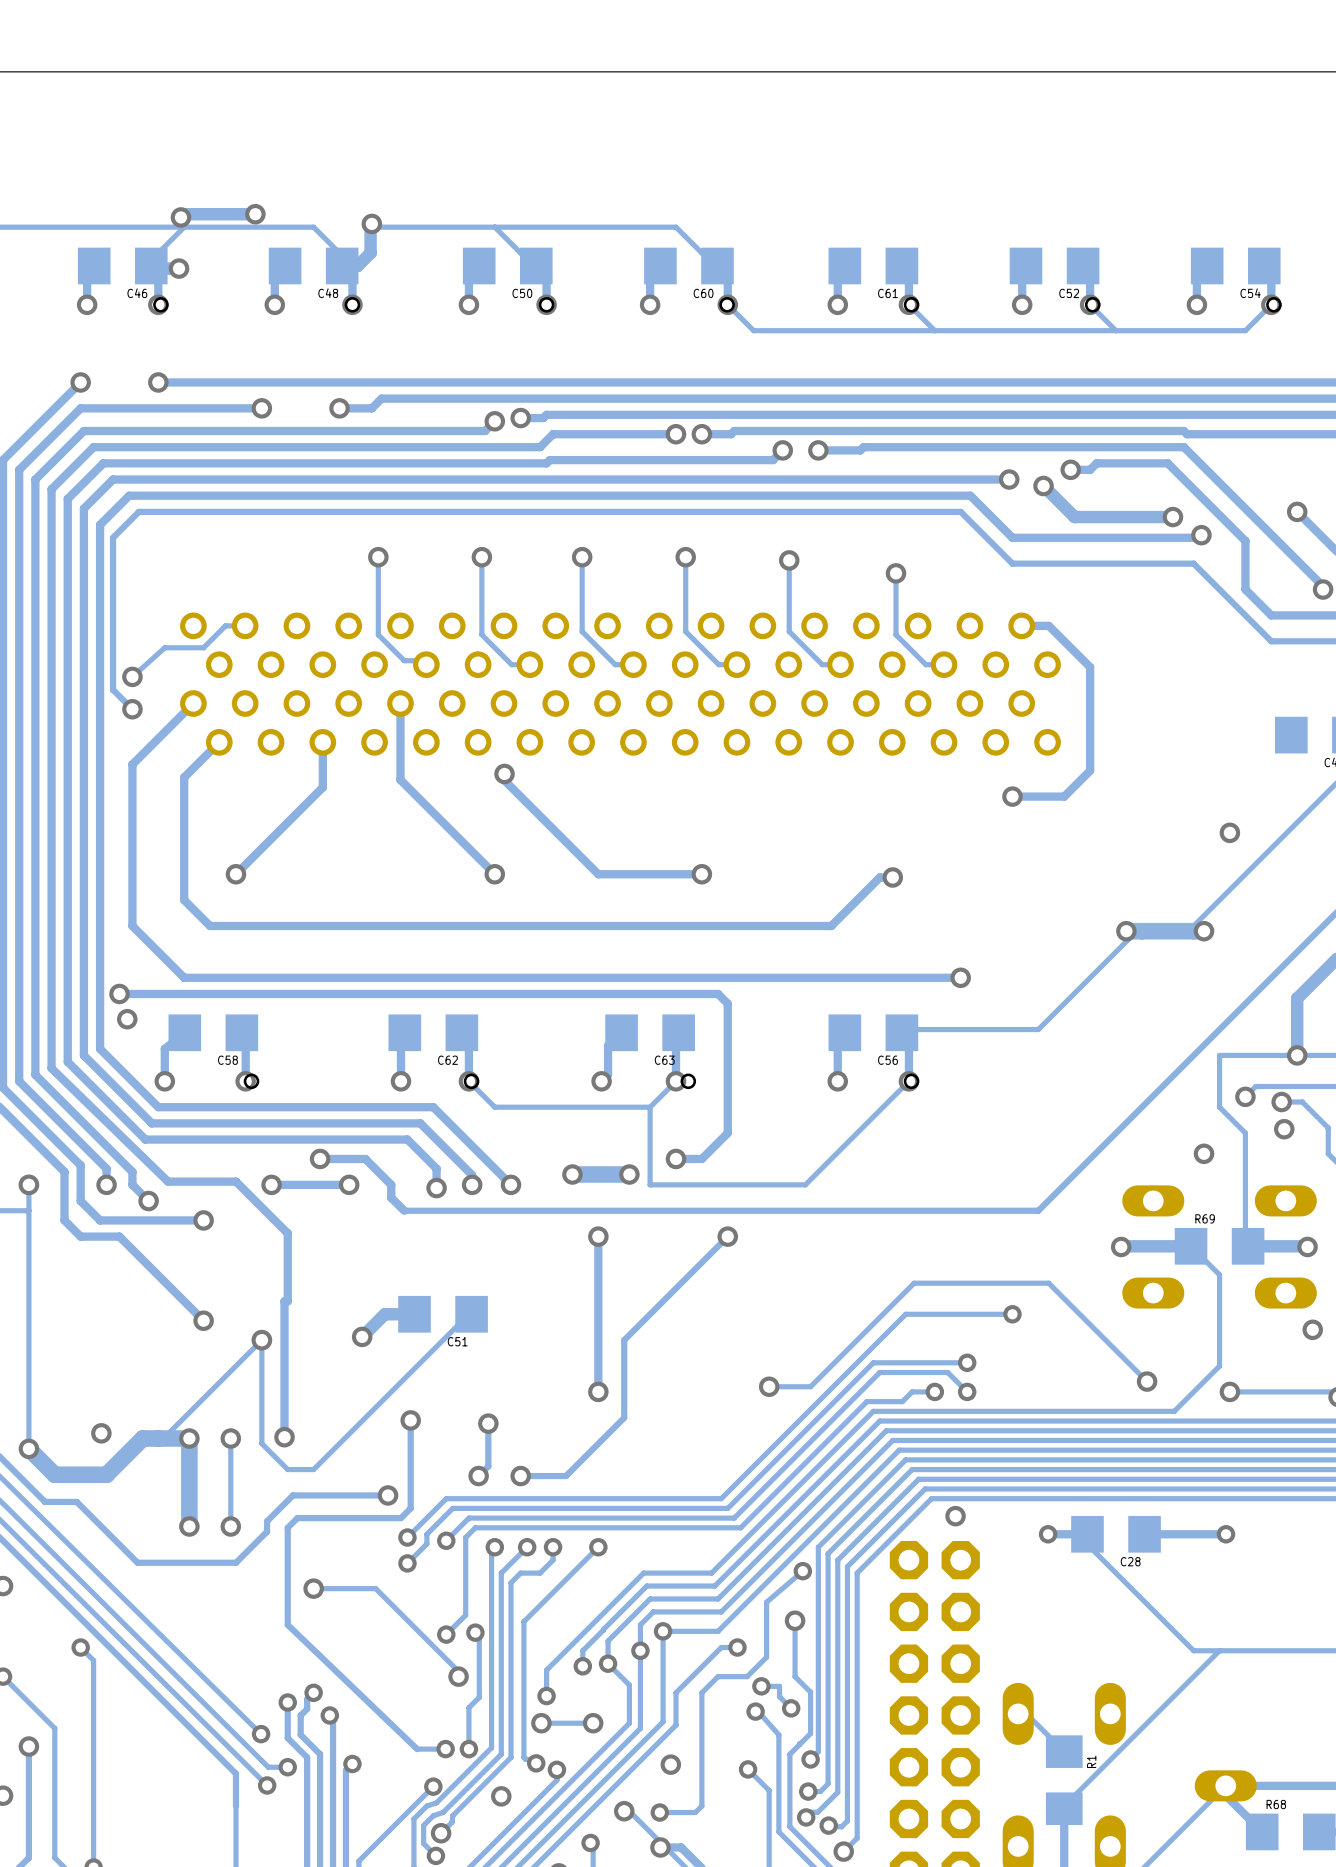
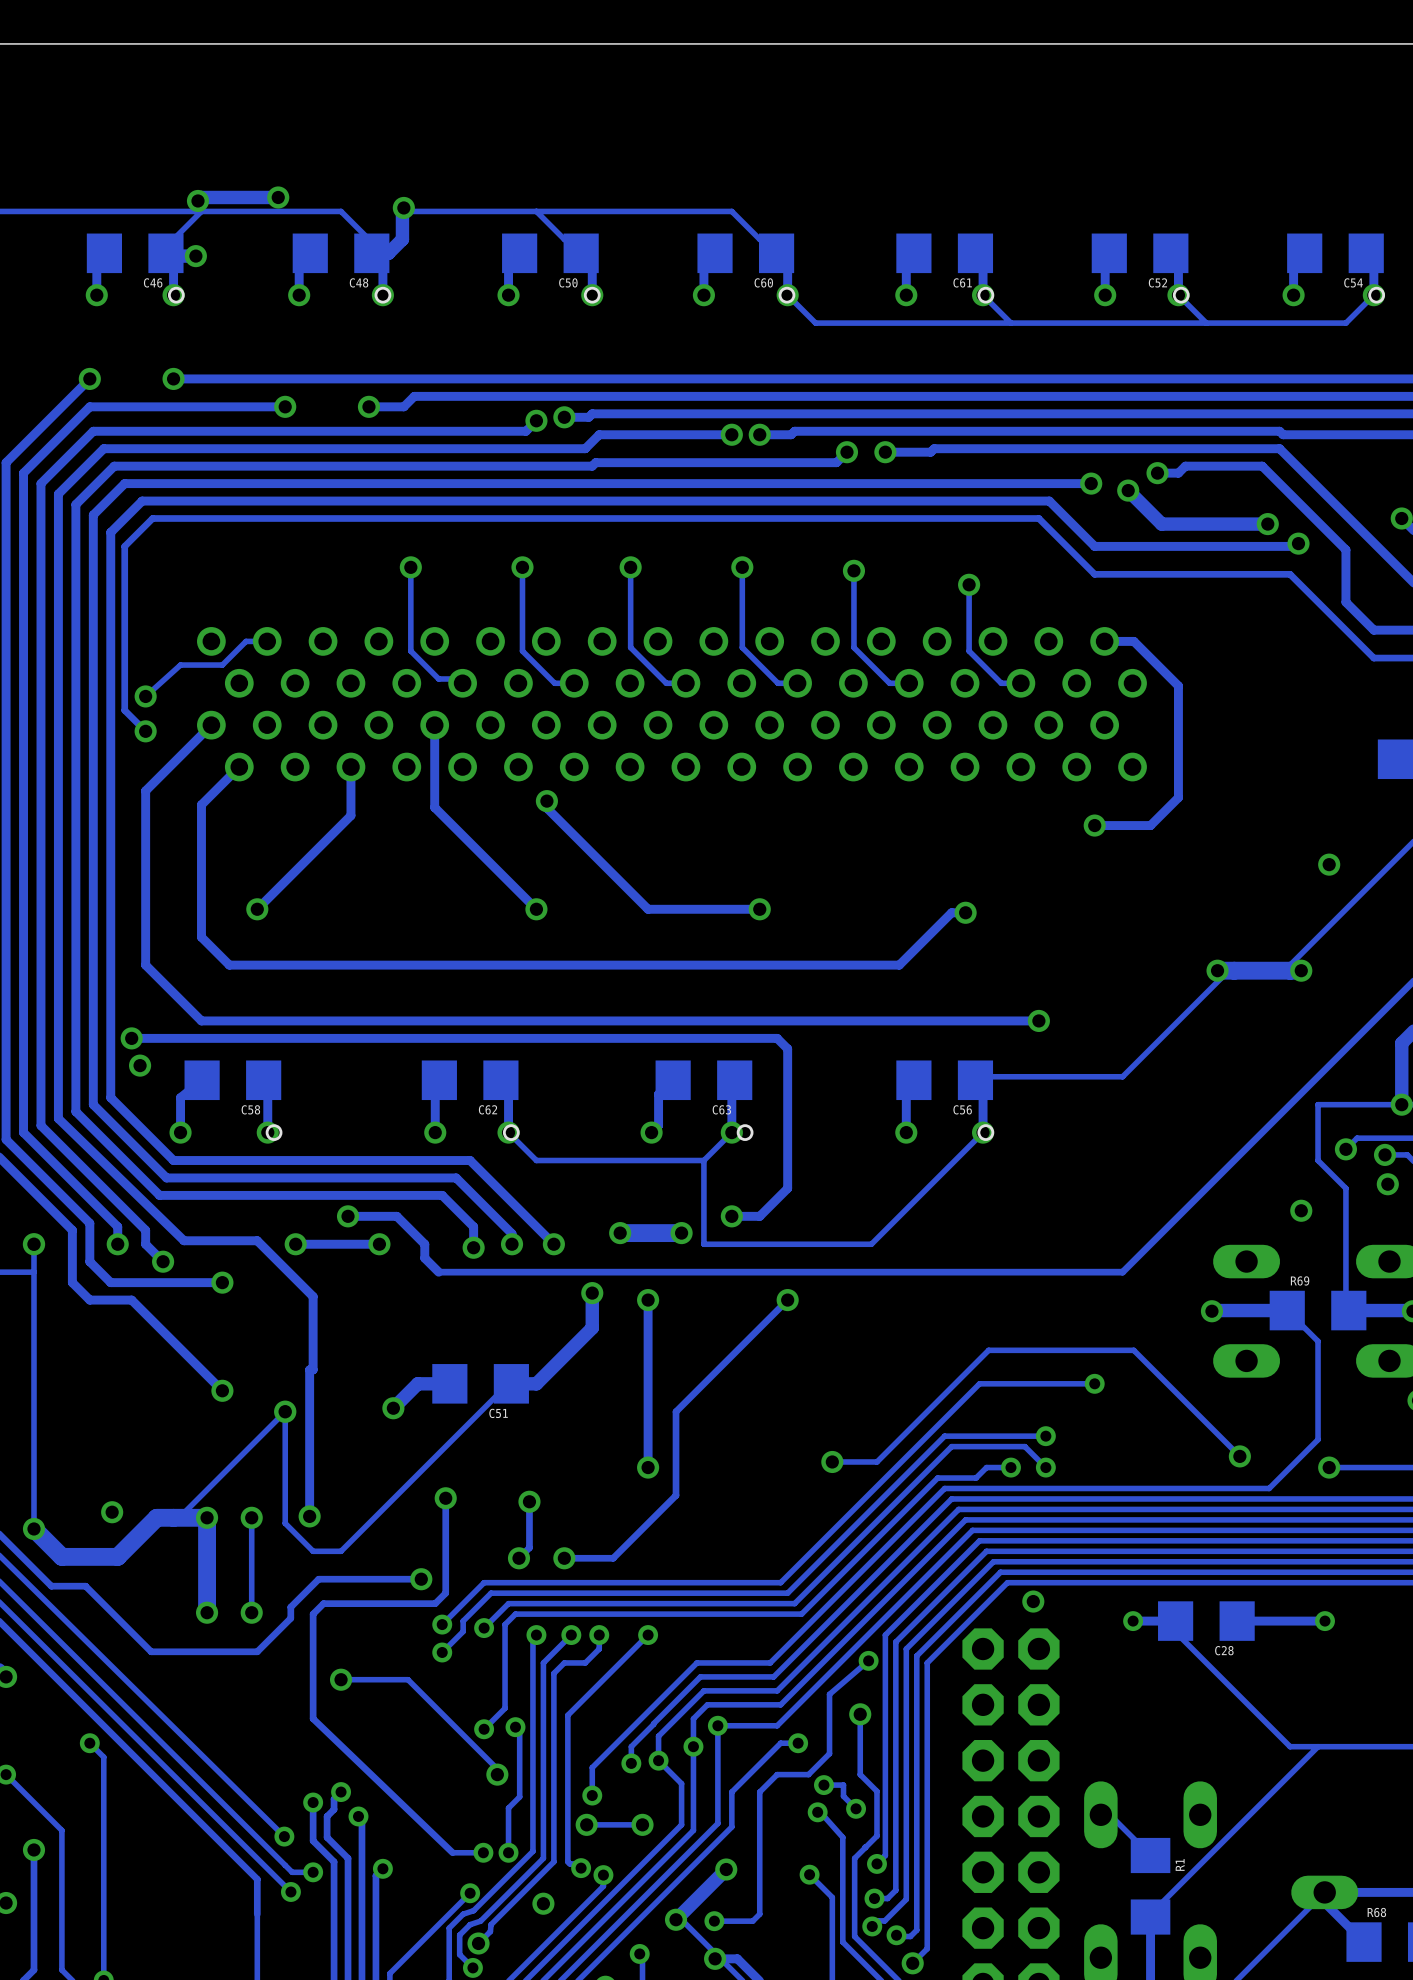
track: none -> (592, 1293) (592, 1327) (536, 1383) (511, 1383)
via: none -> (592, 1293)
track: none -> (726, 1869) (676, 1919)

